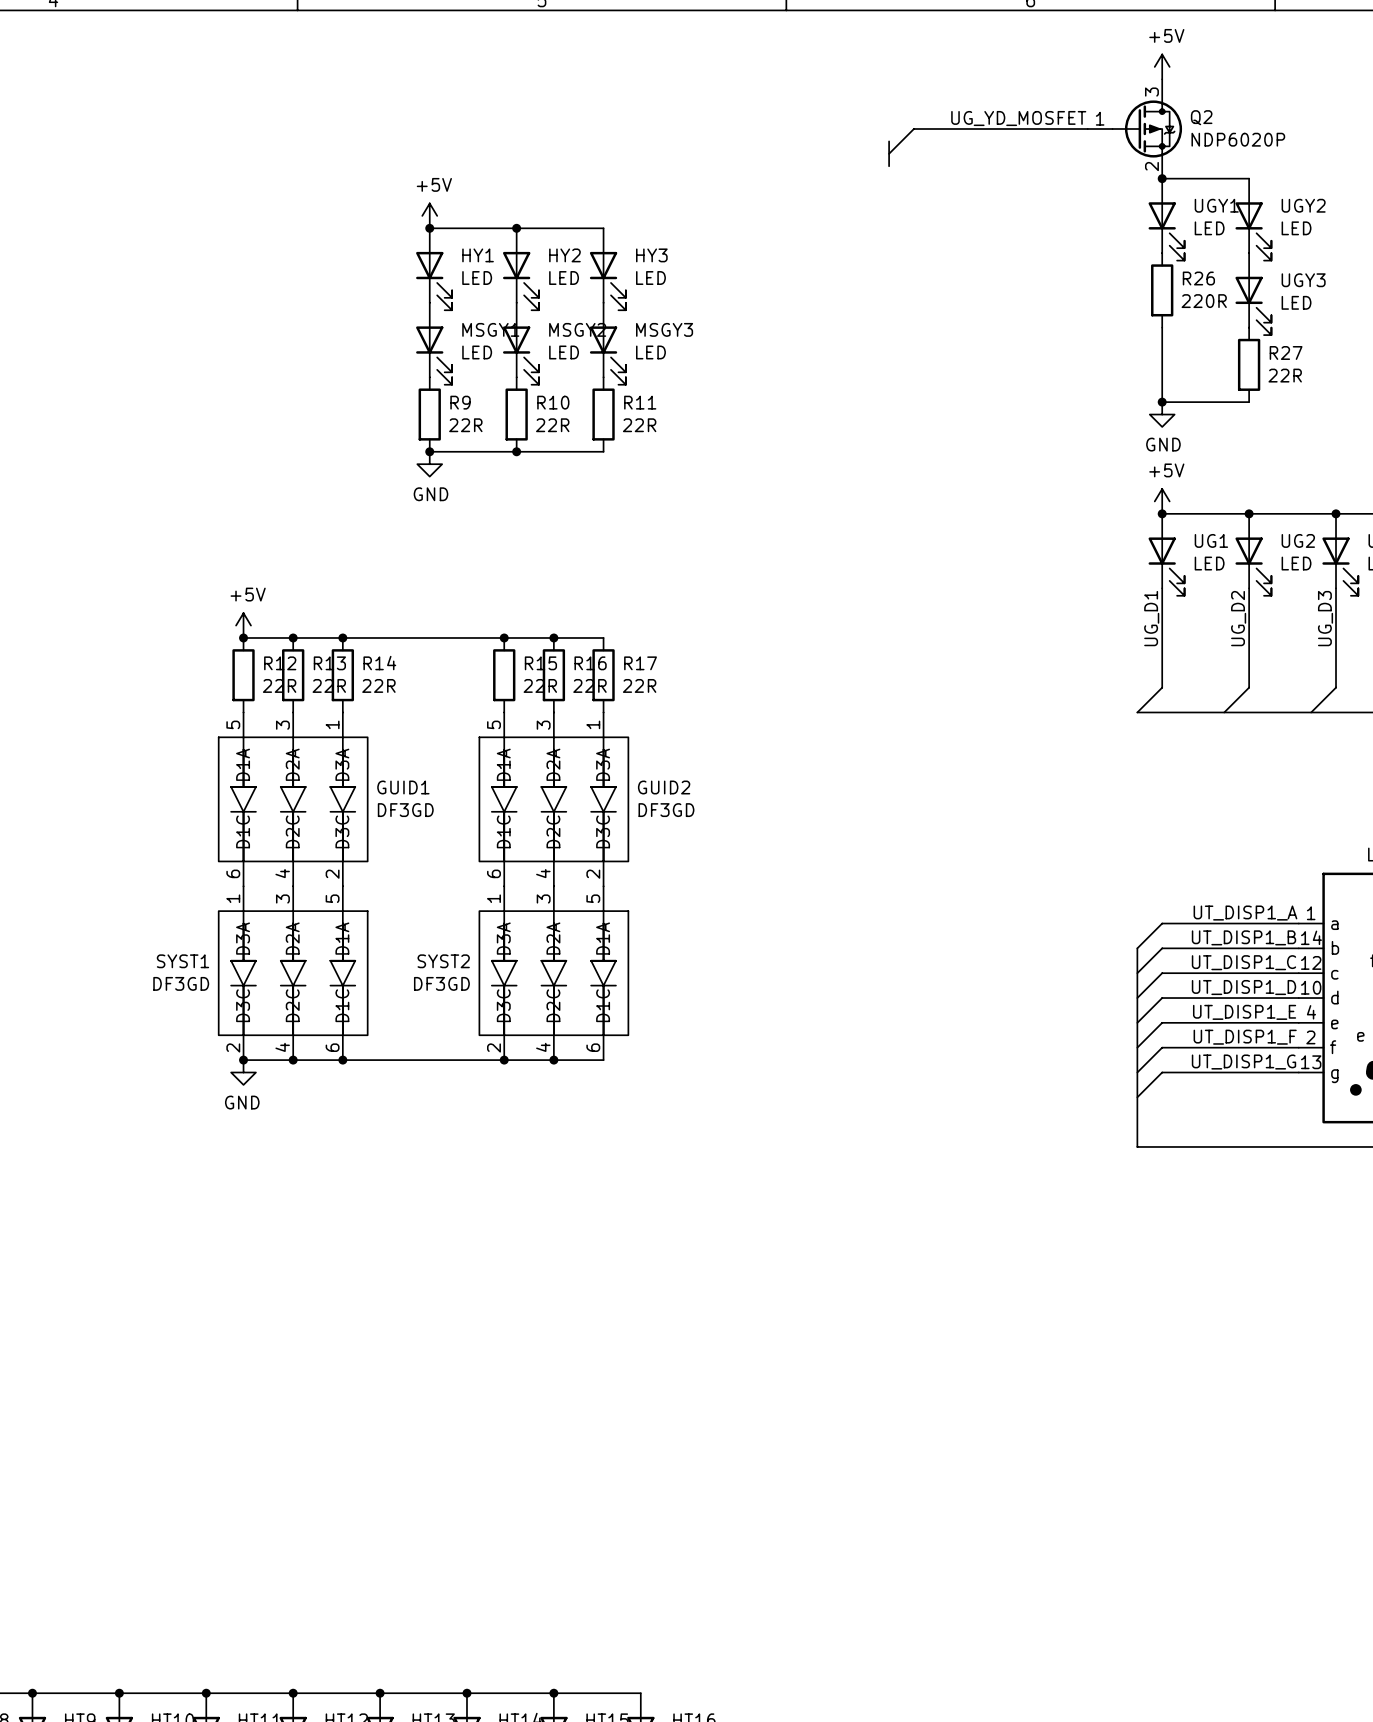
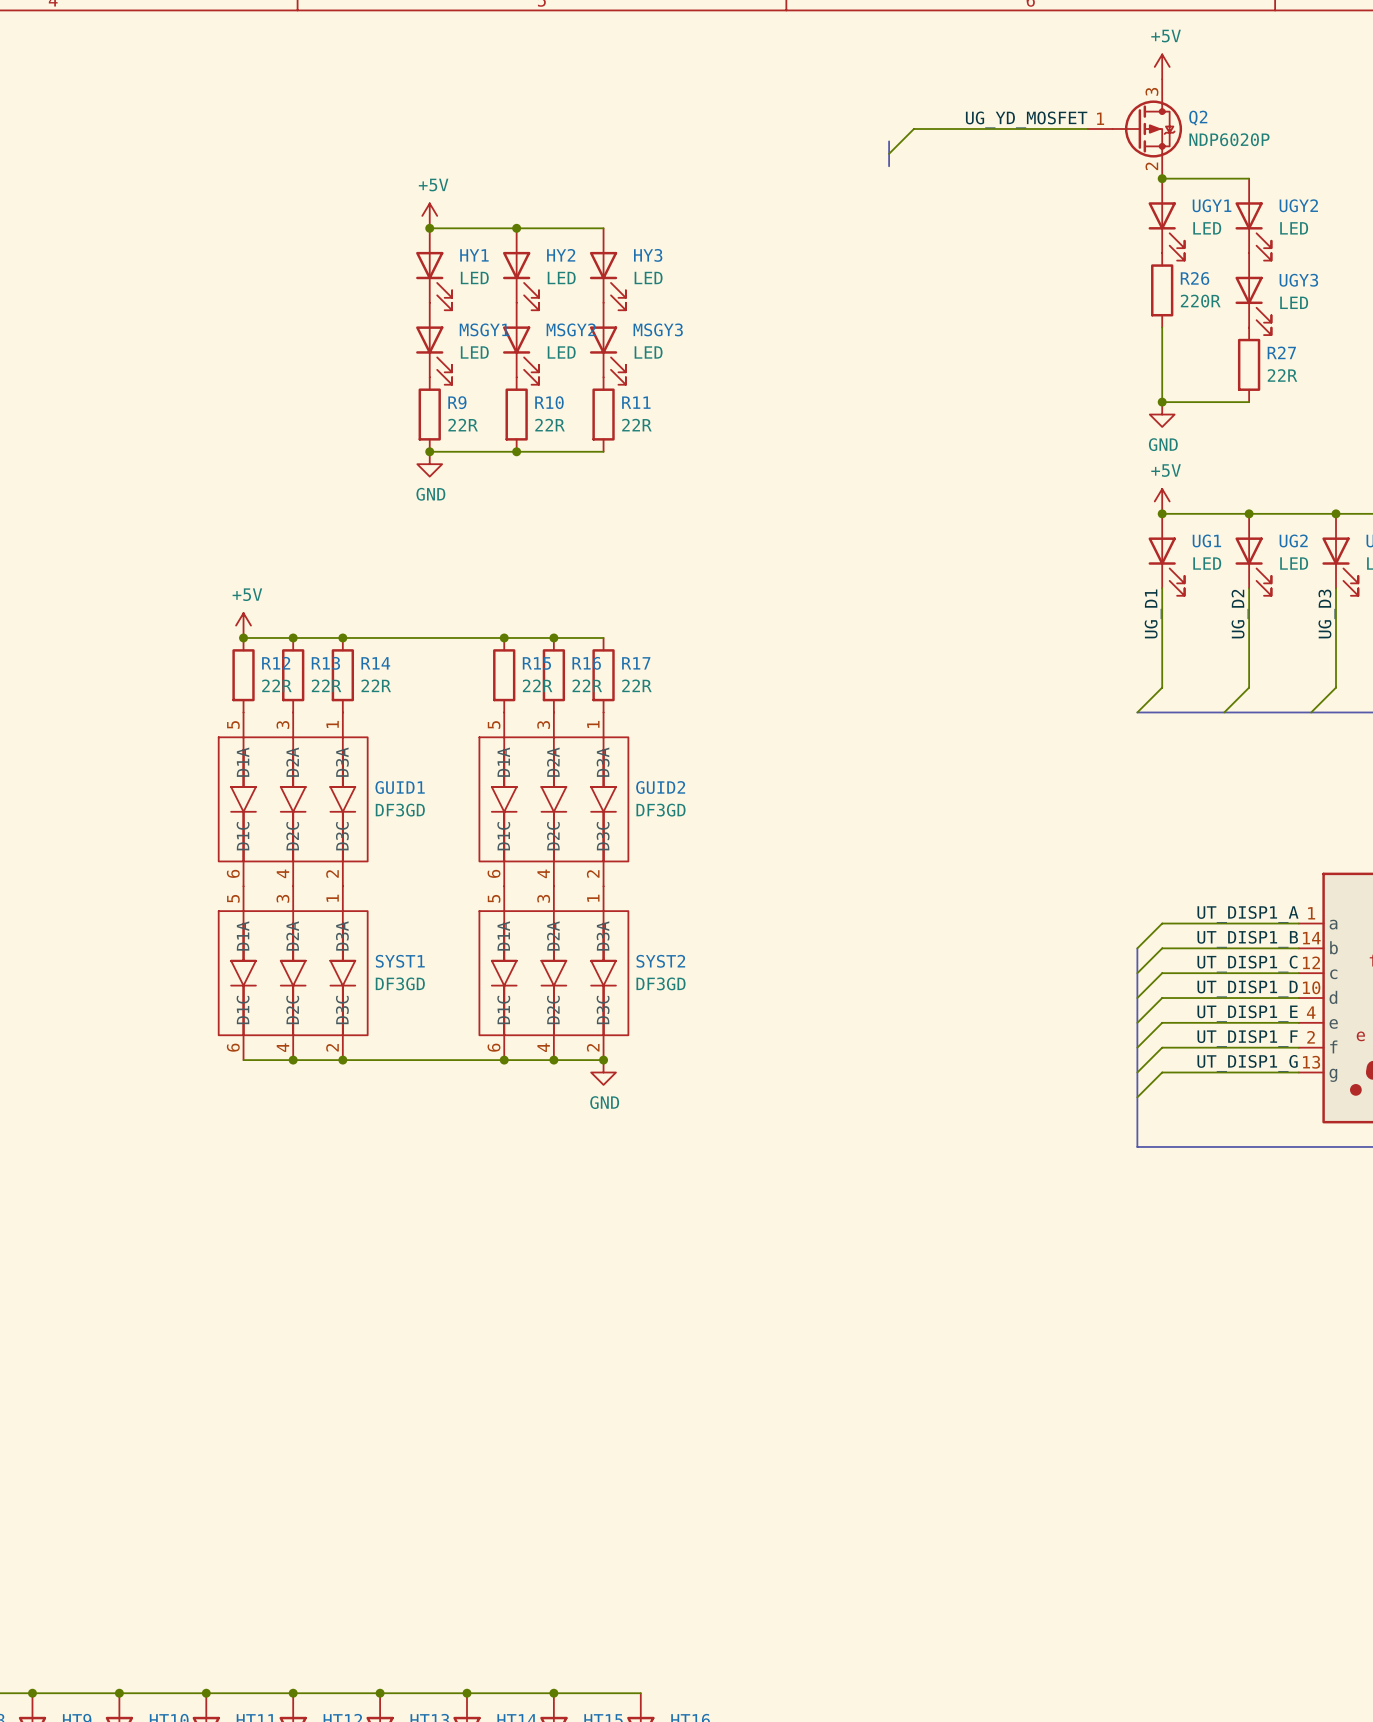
SYST1 flip: as is (293, 973) -> left-right (293, 973)
SYST2 flip: as is (553, 973) -> left-right (553, 973)
junction: (243, 1060) -> none
junction: none -> (603, 1060)
power symbol: GND (243, 1072) -> none
power symbol: none -> GND (603, 1072)

